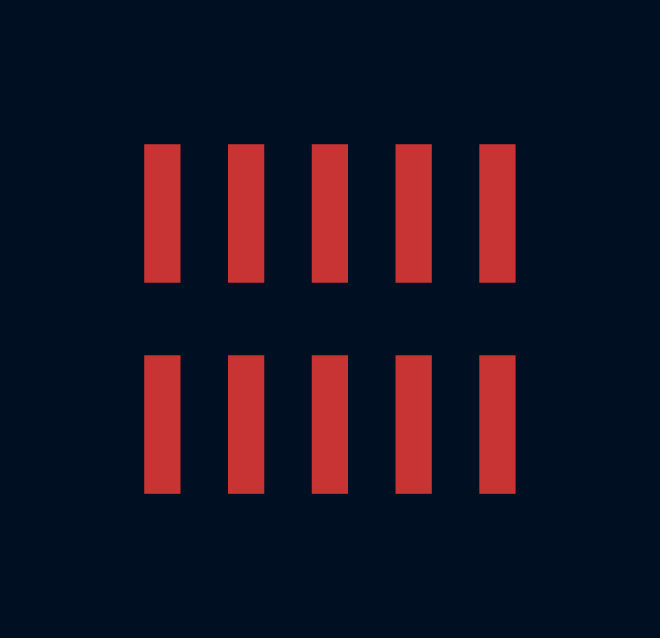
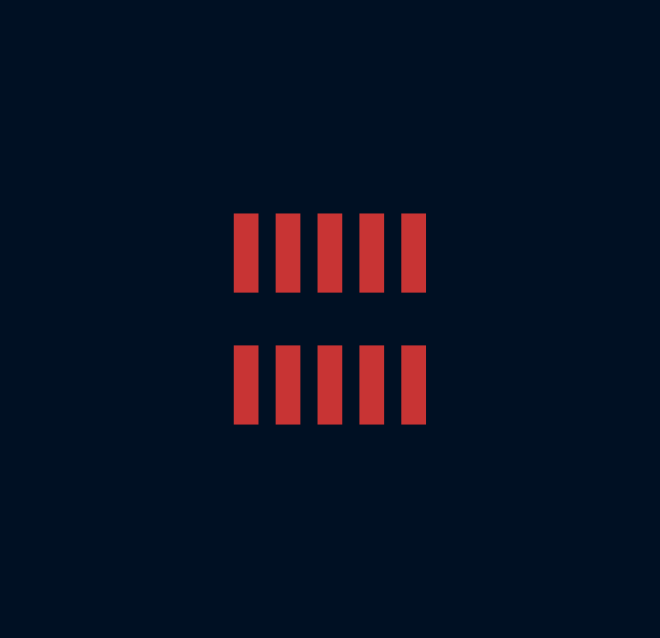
part footprint: [144, 144, 516, 494] -> [233, 213, 427, 425]

